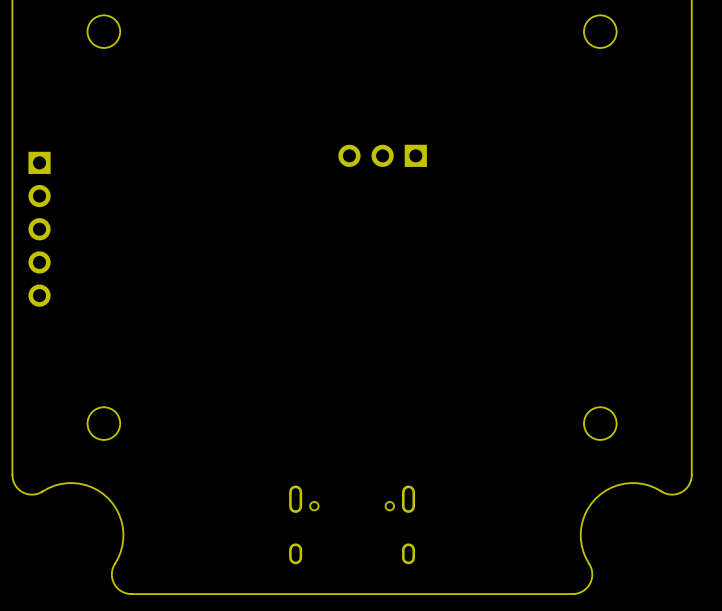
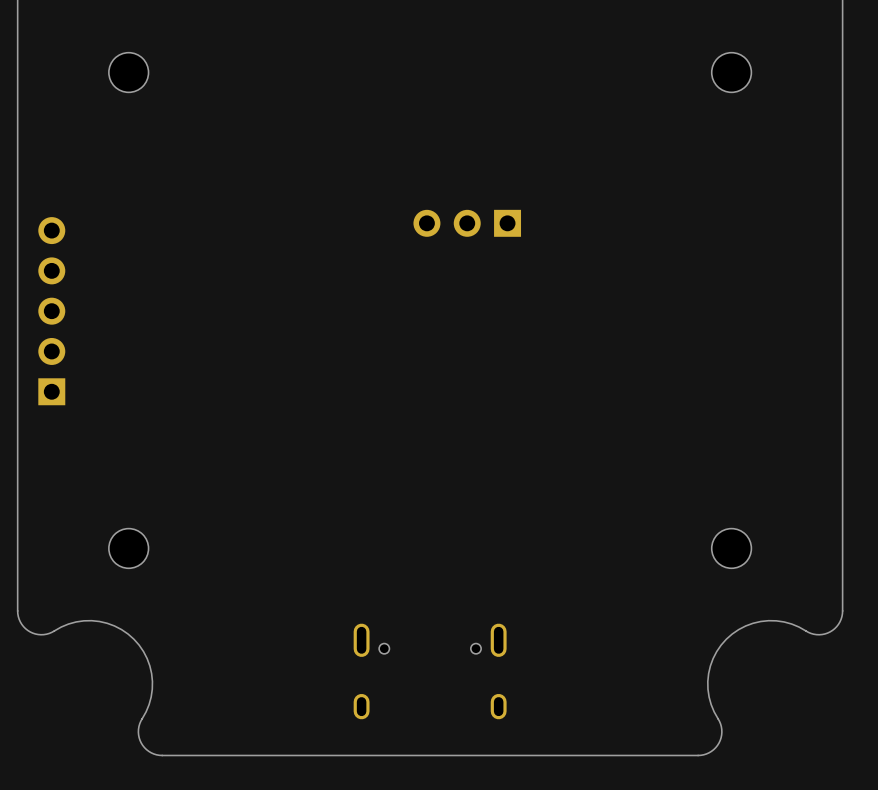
part rotation: 0° (39, 229) -> 180° (51, 311)

